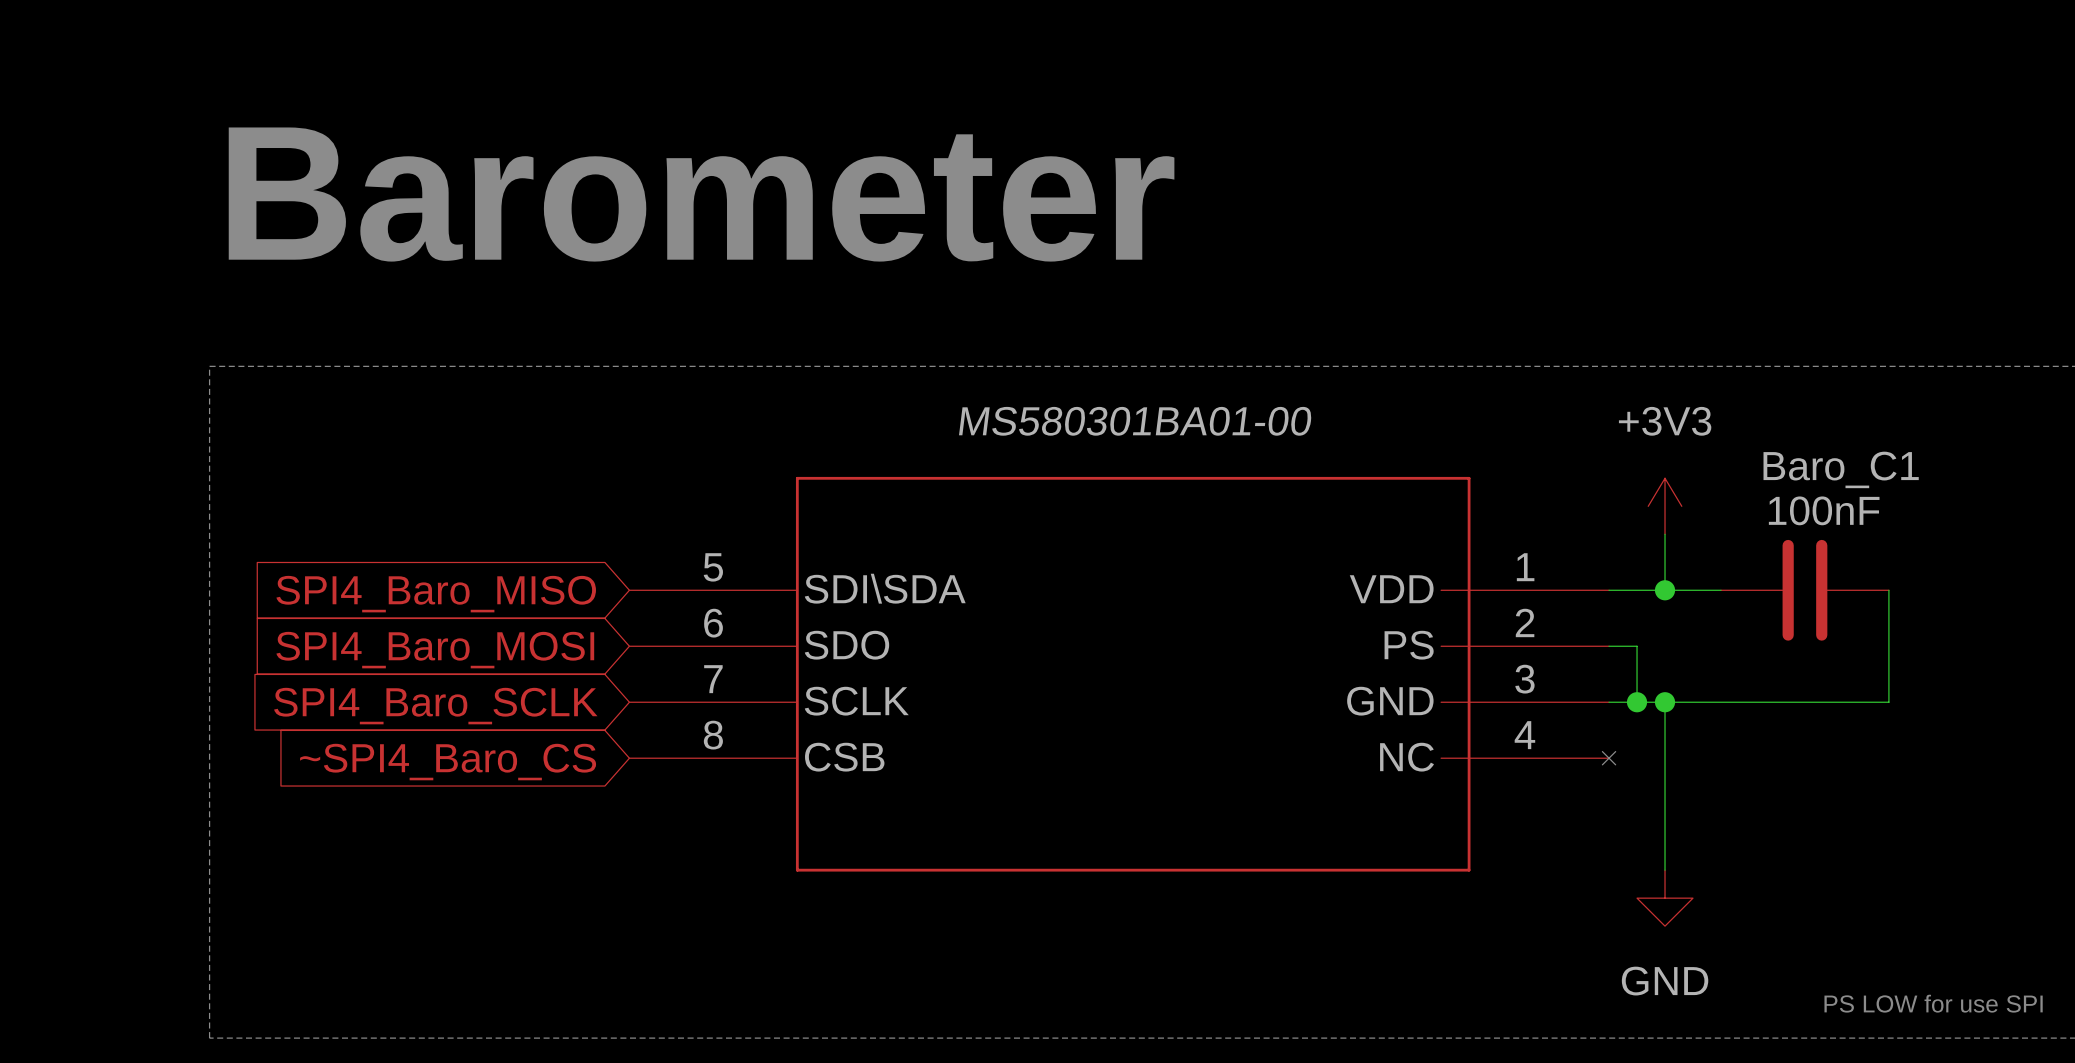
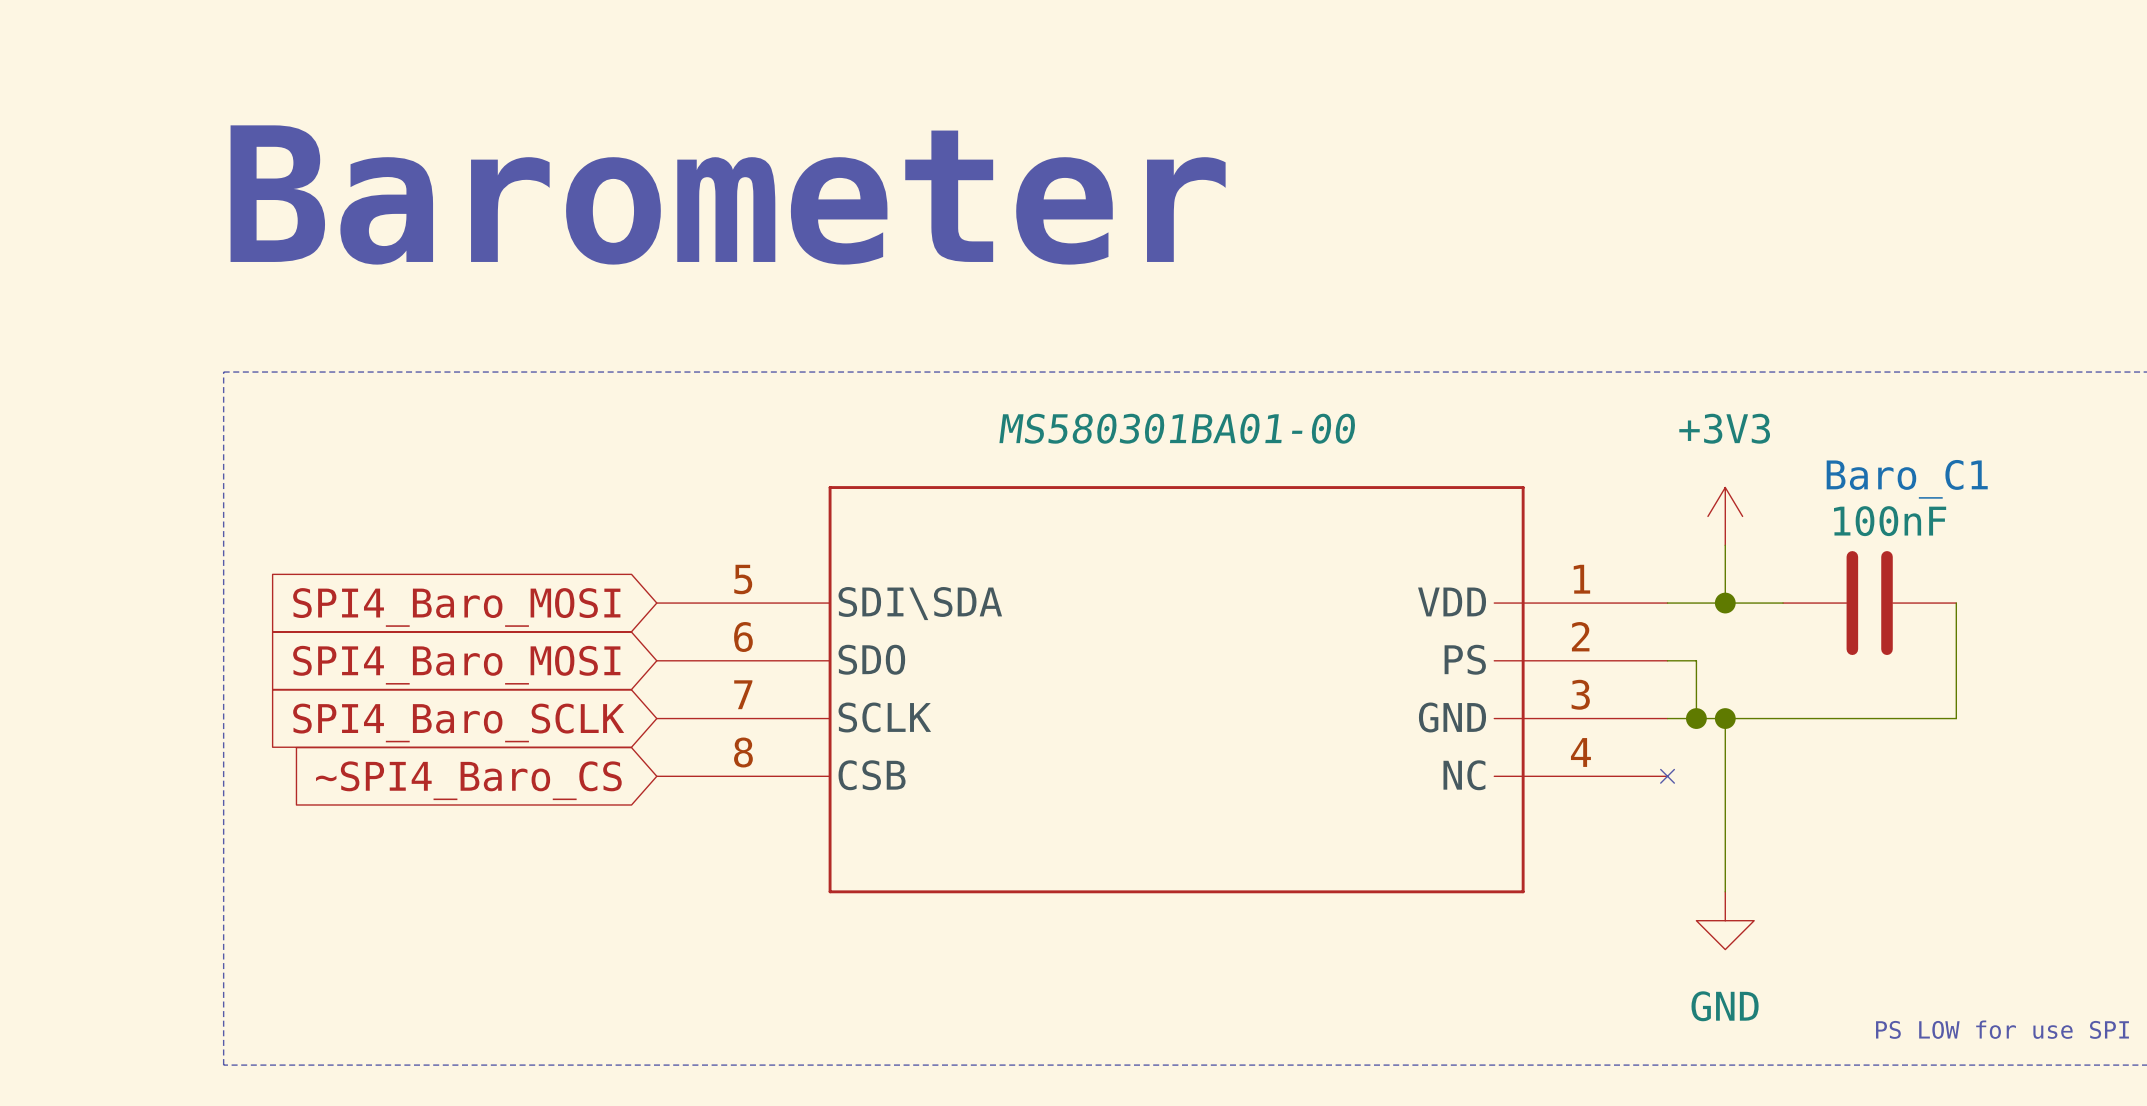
global label: SPI4_Baro_MISO (436, 594) -> SPI4_Baro_MOSI (456, 607)

